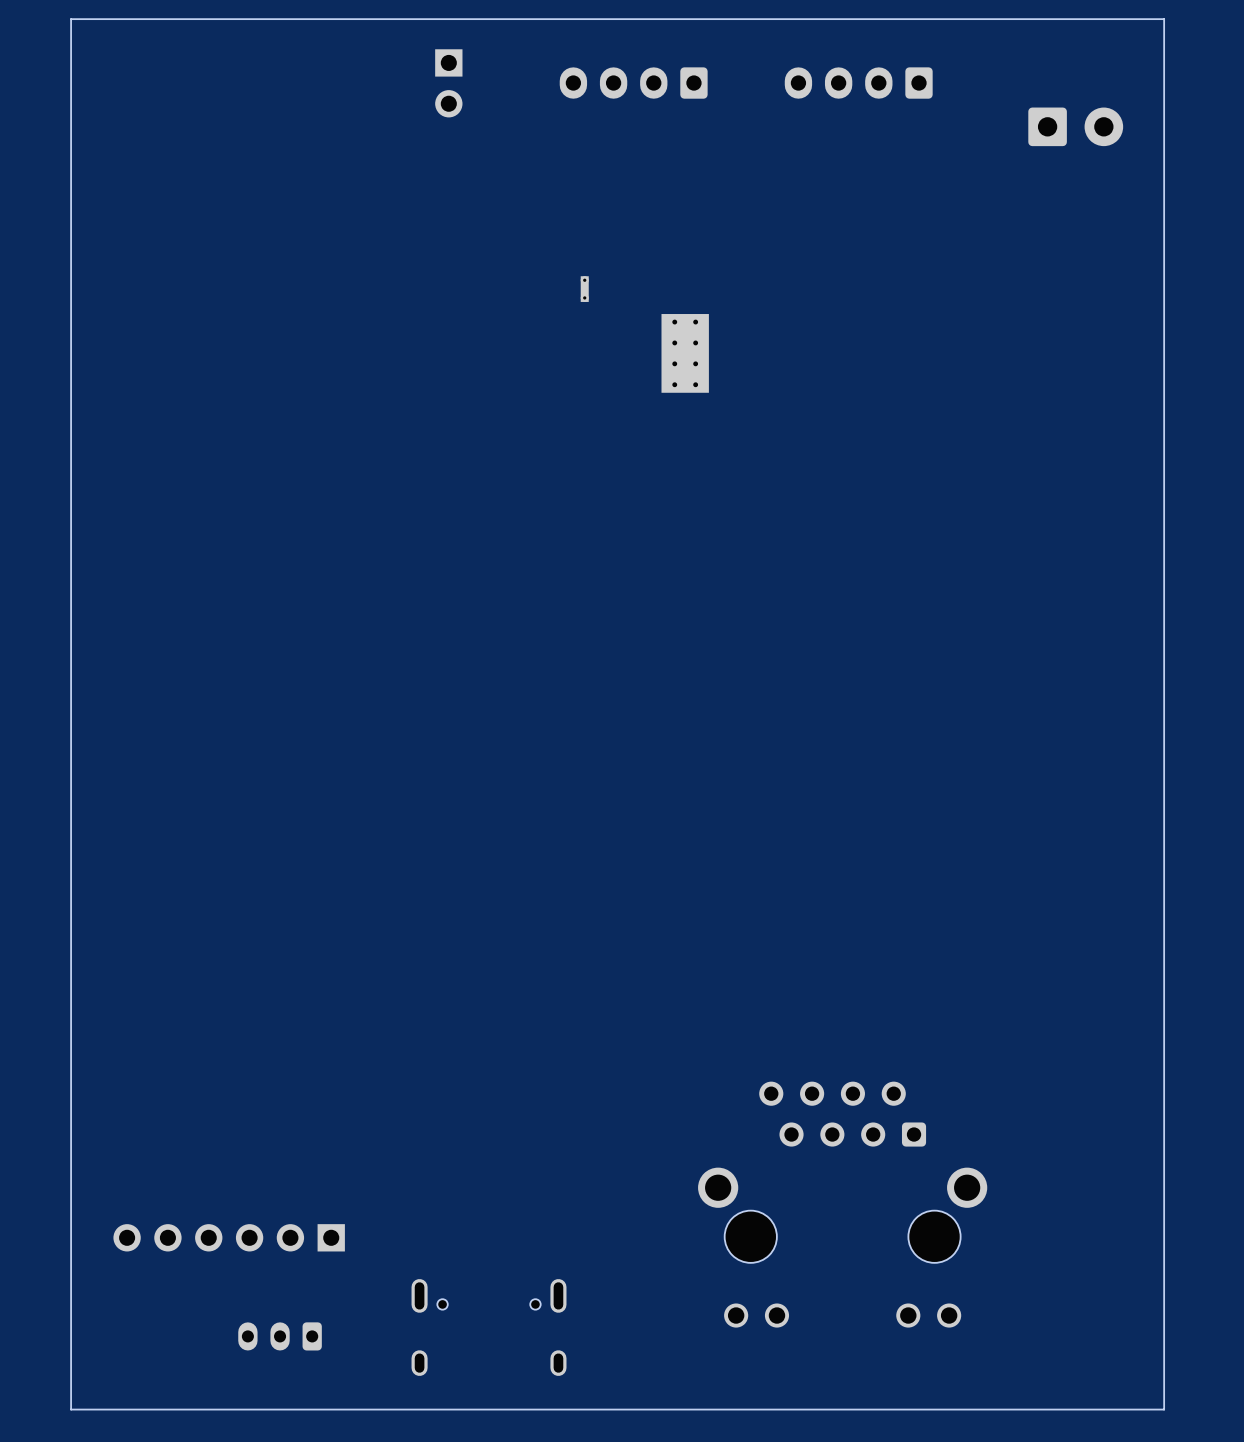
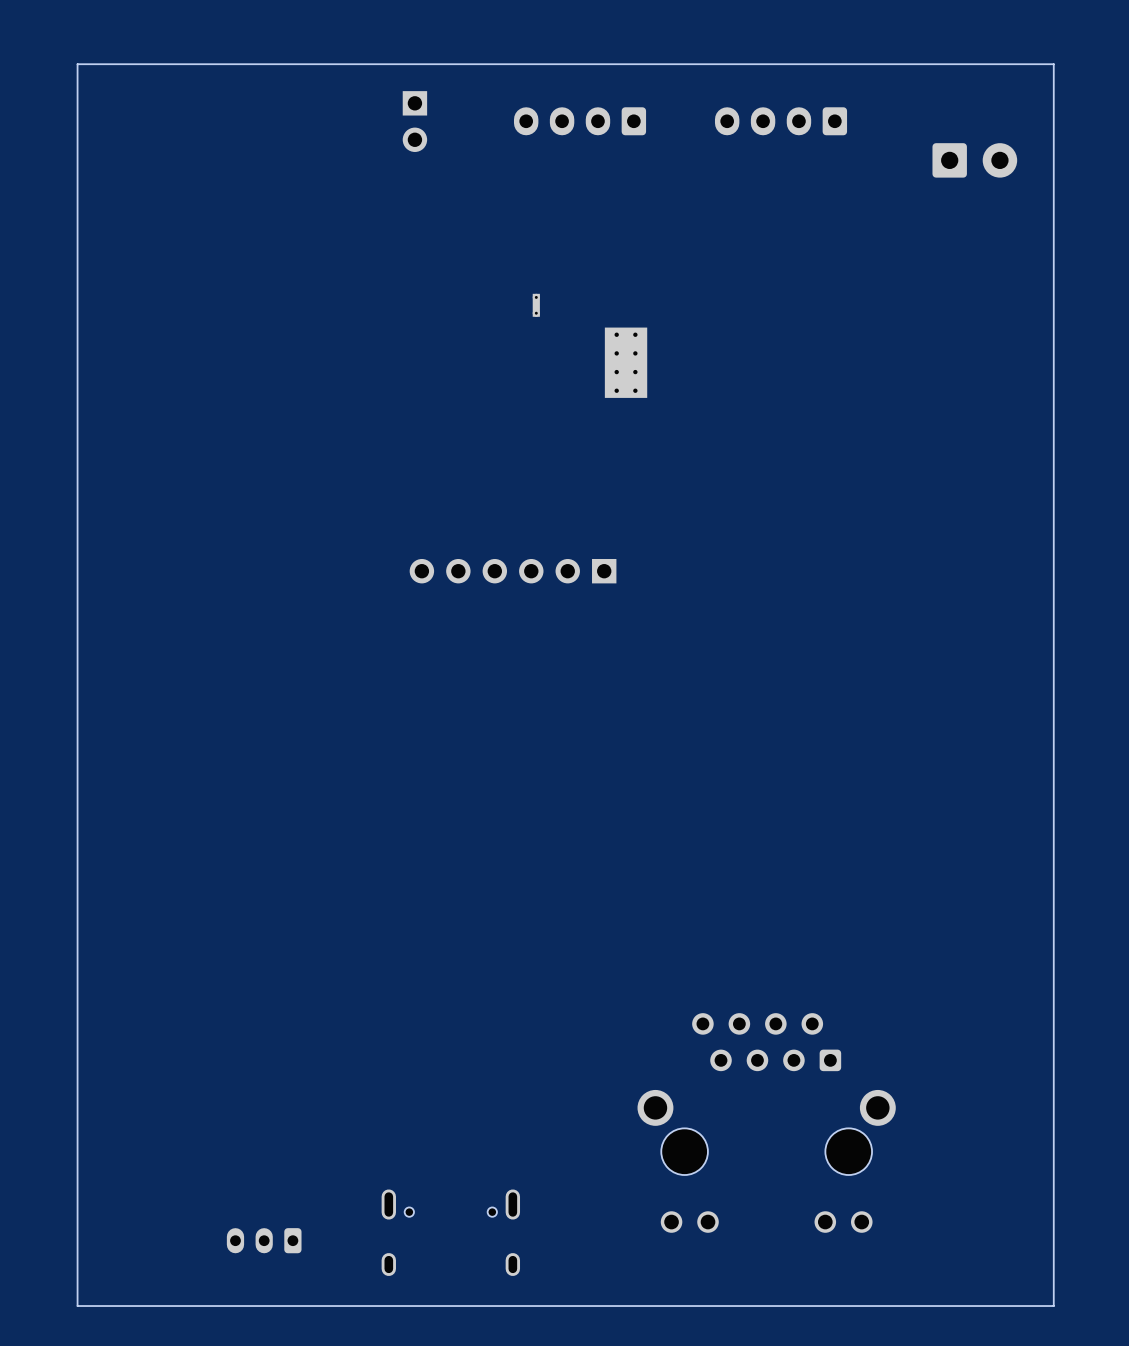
part: none -> (513, 571)
part: (229, 1237) -> none

